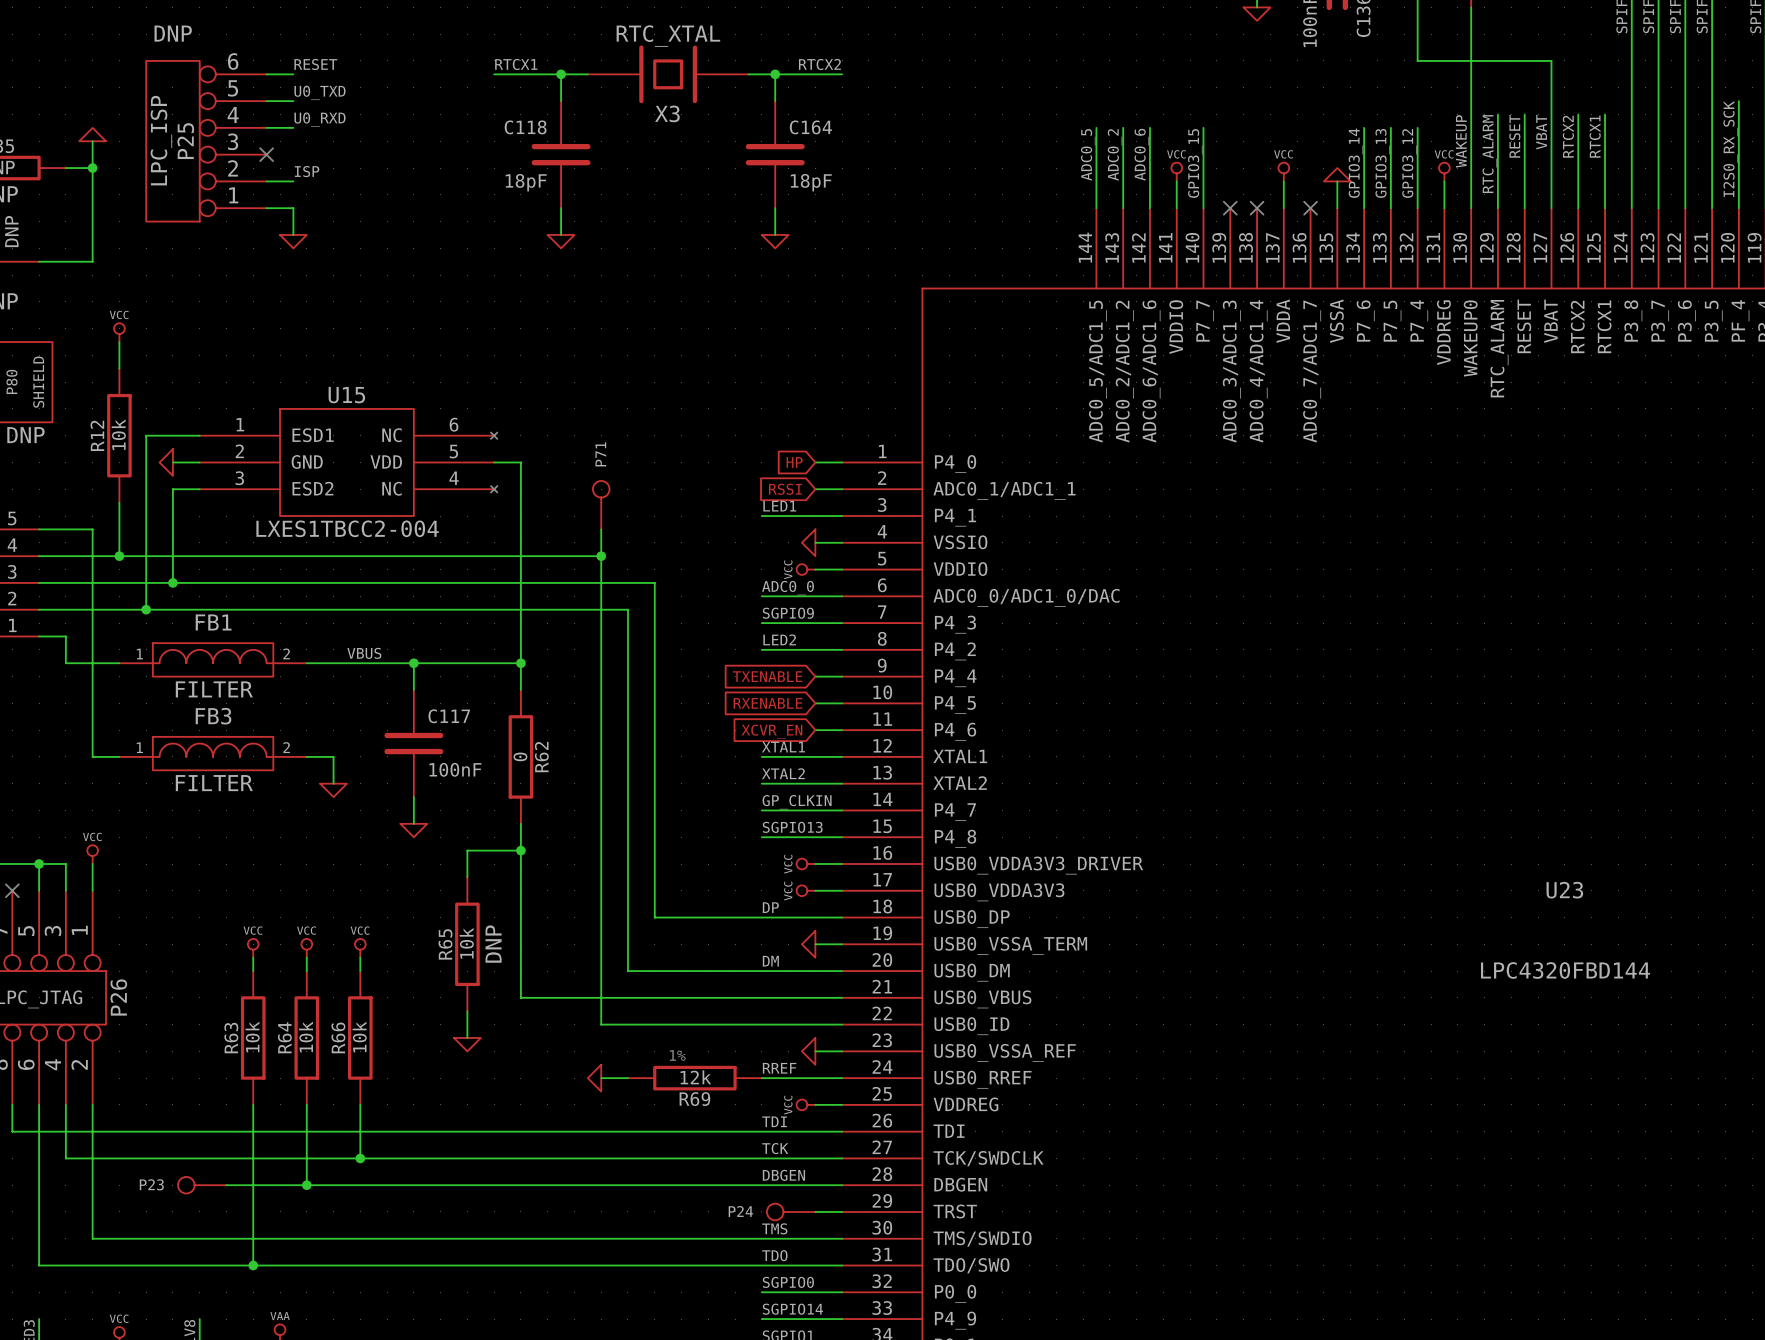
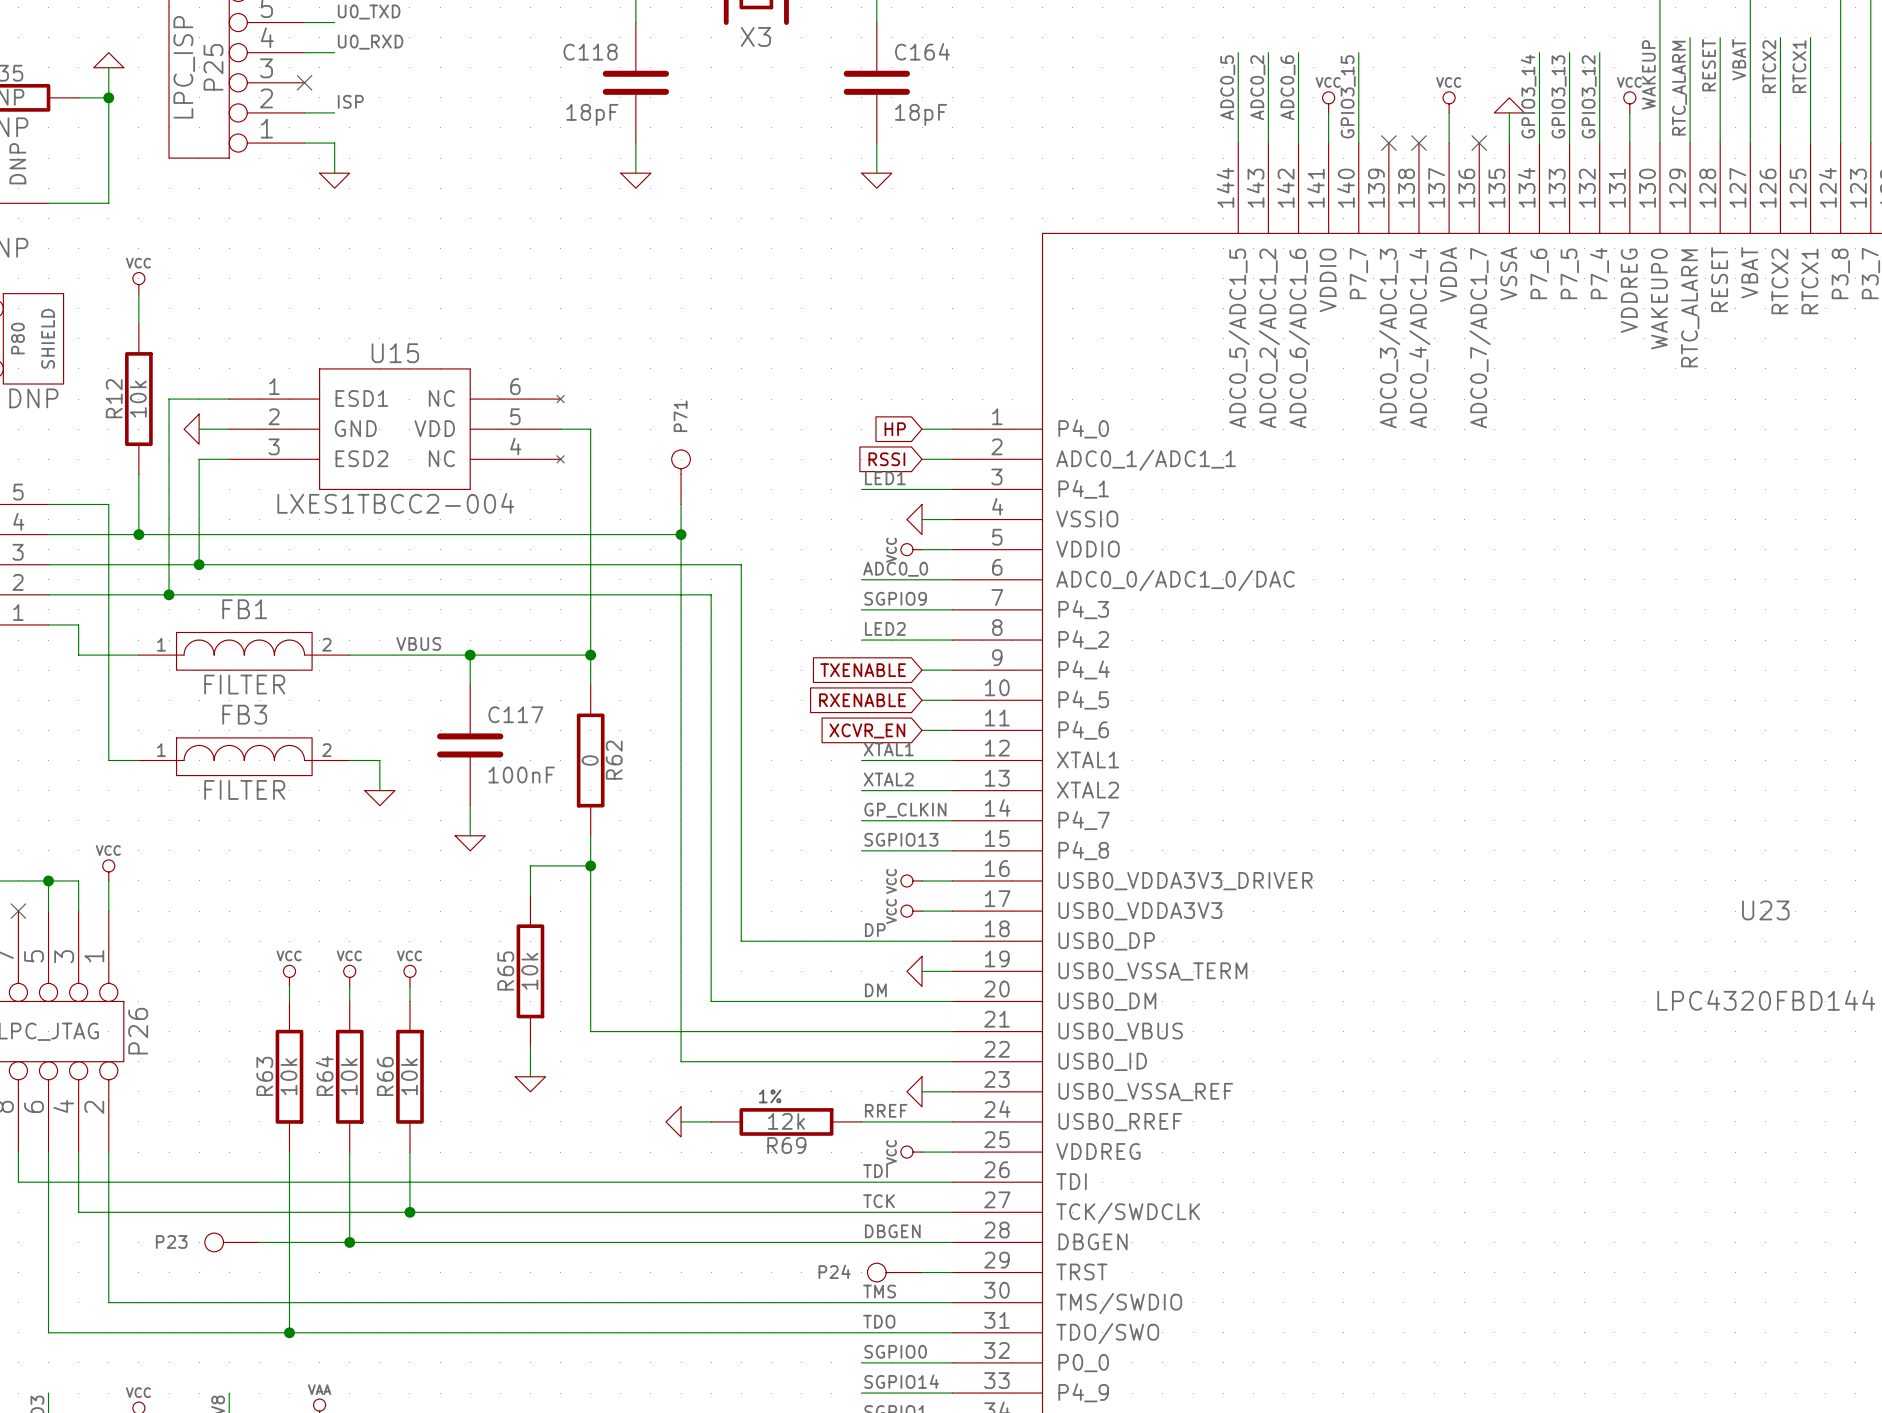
R65 text: DNP (493, 944) -> none

